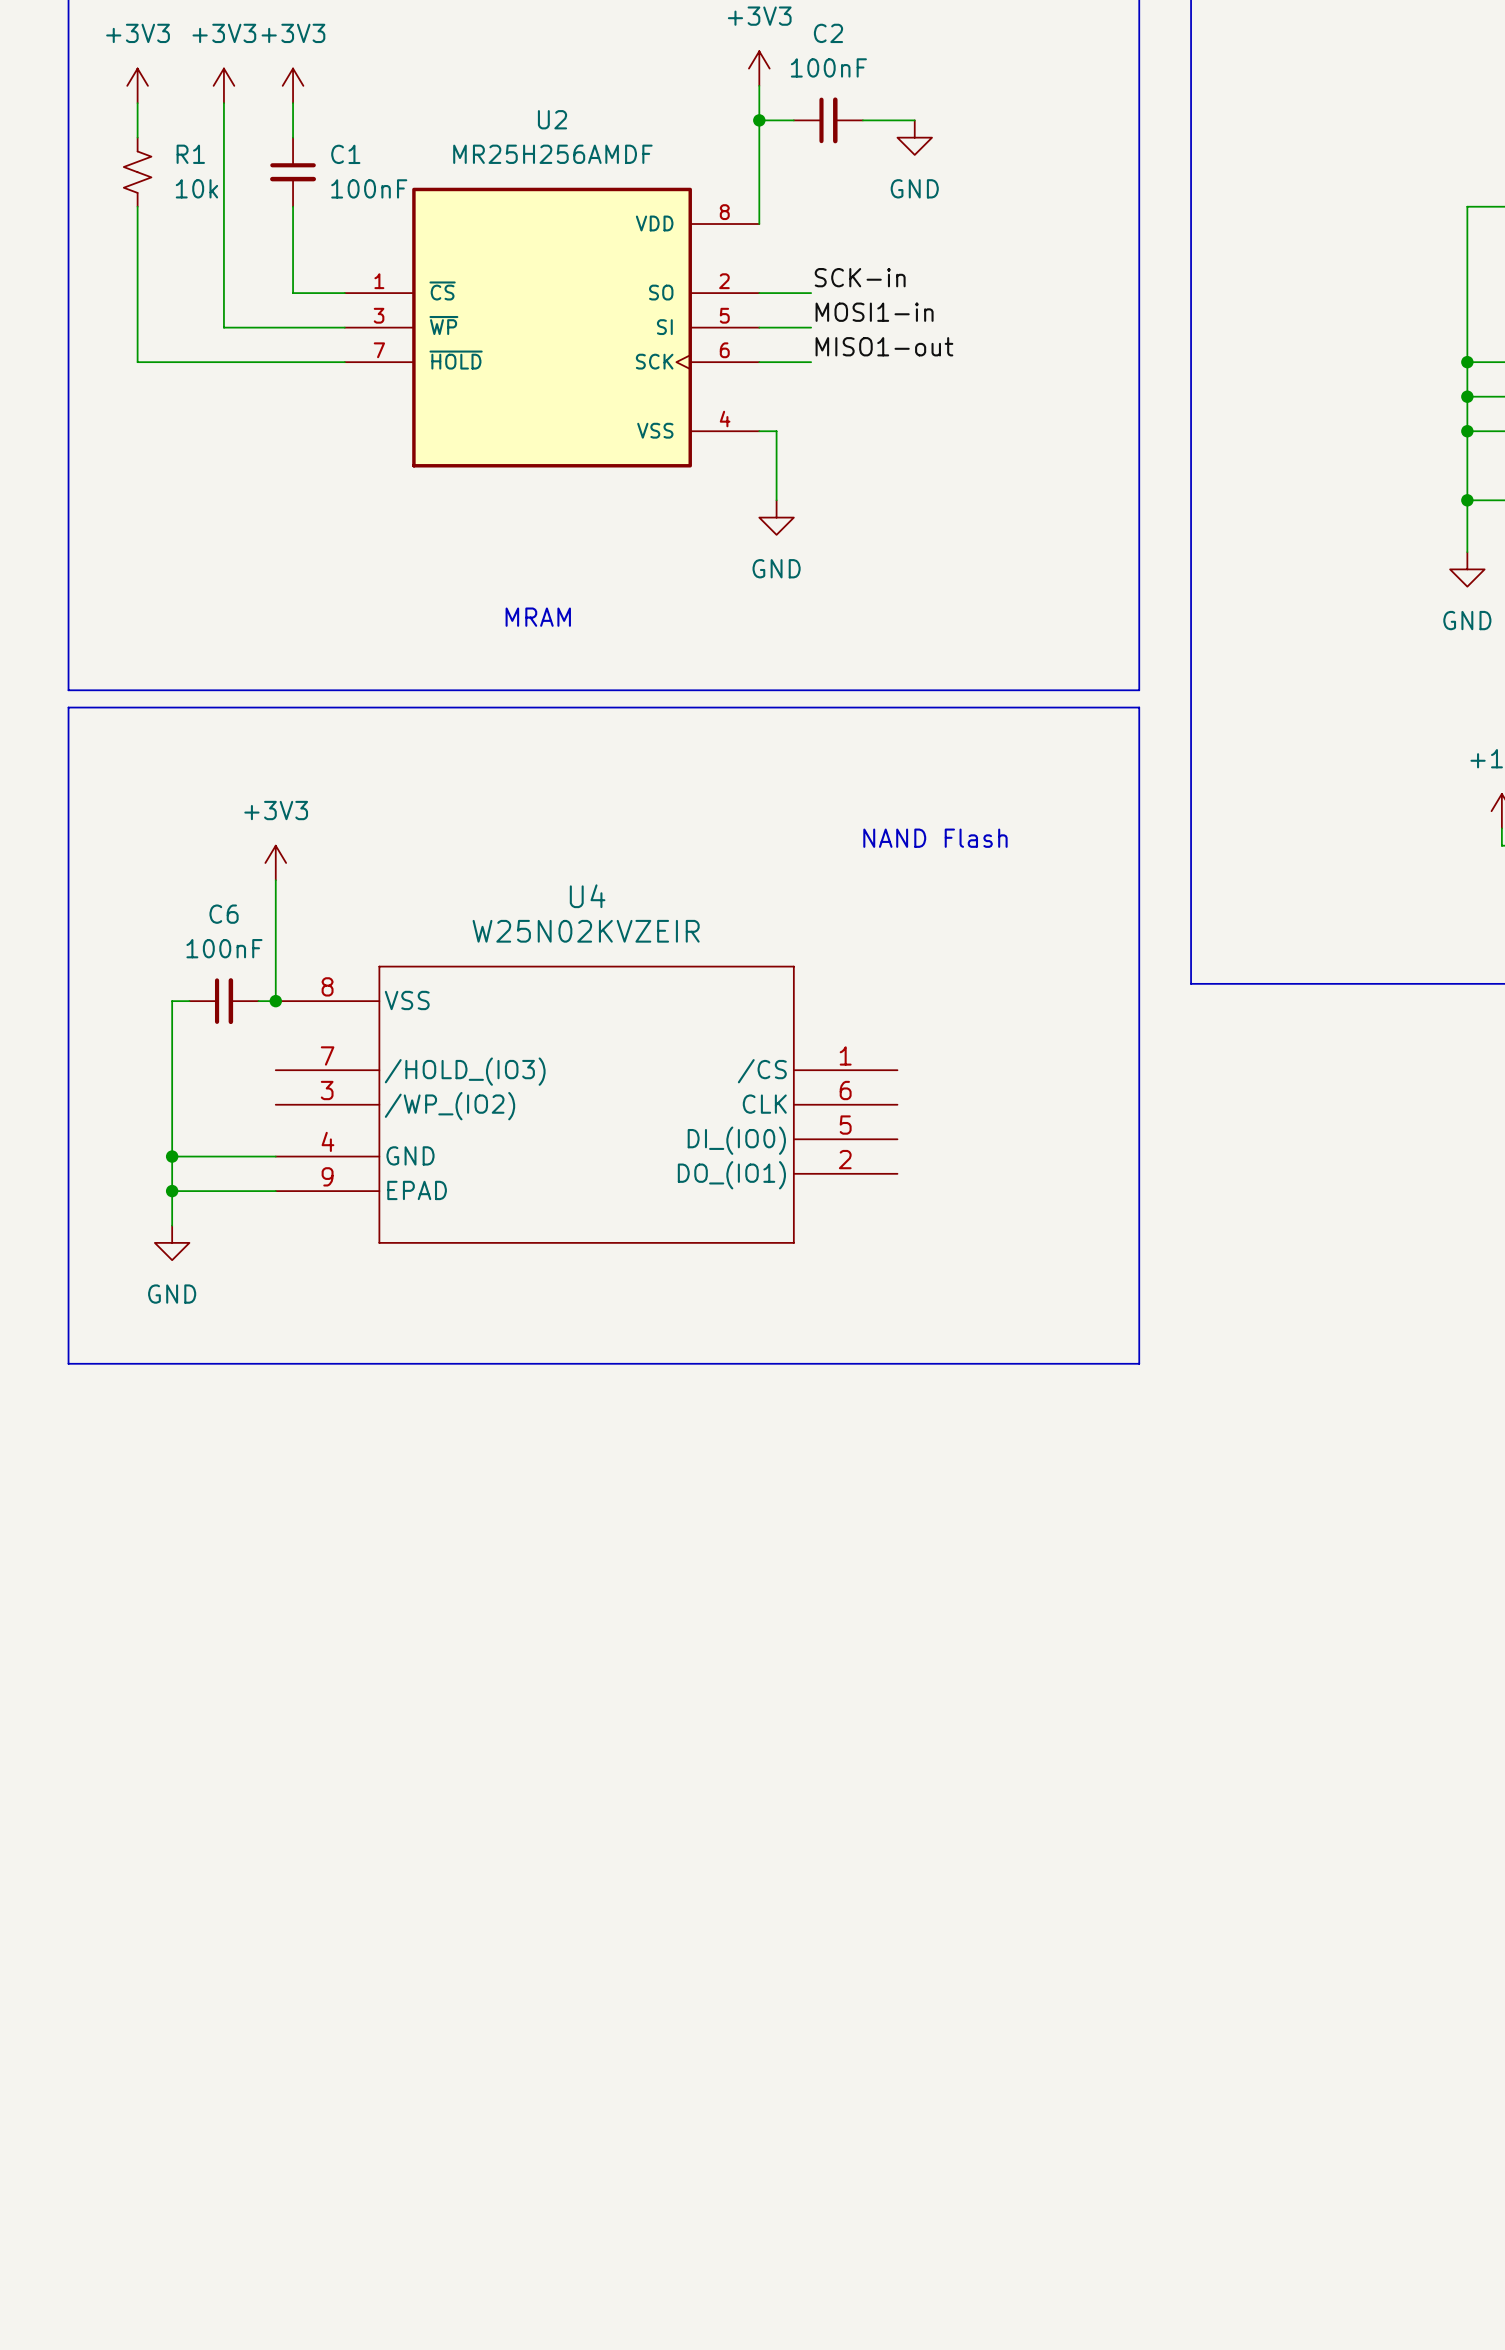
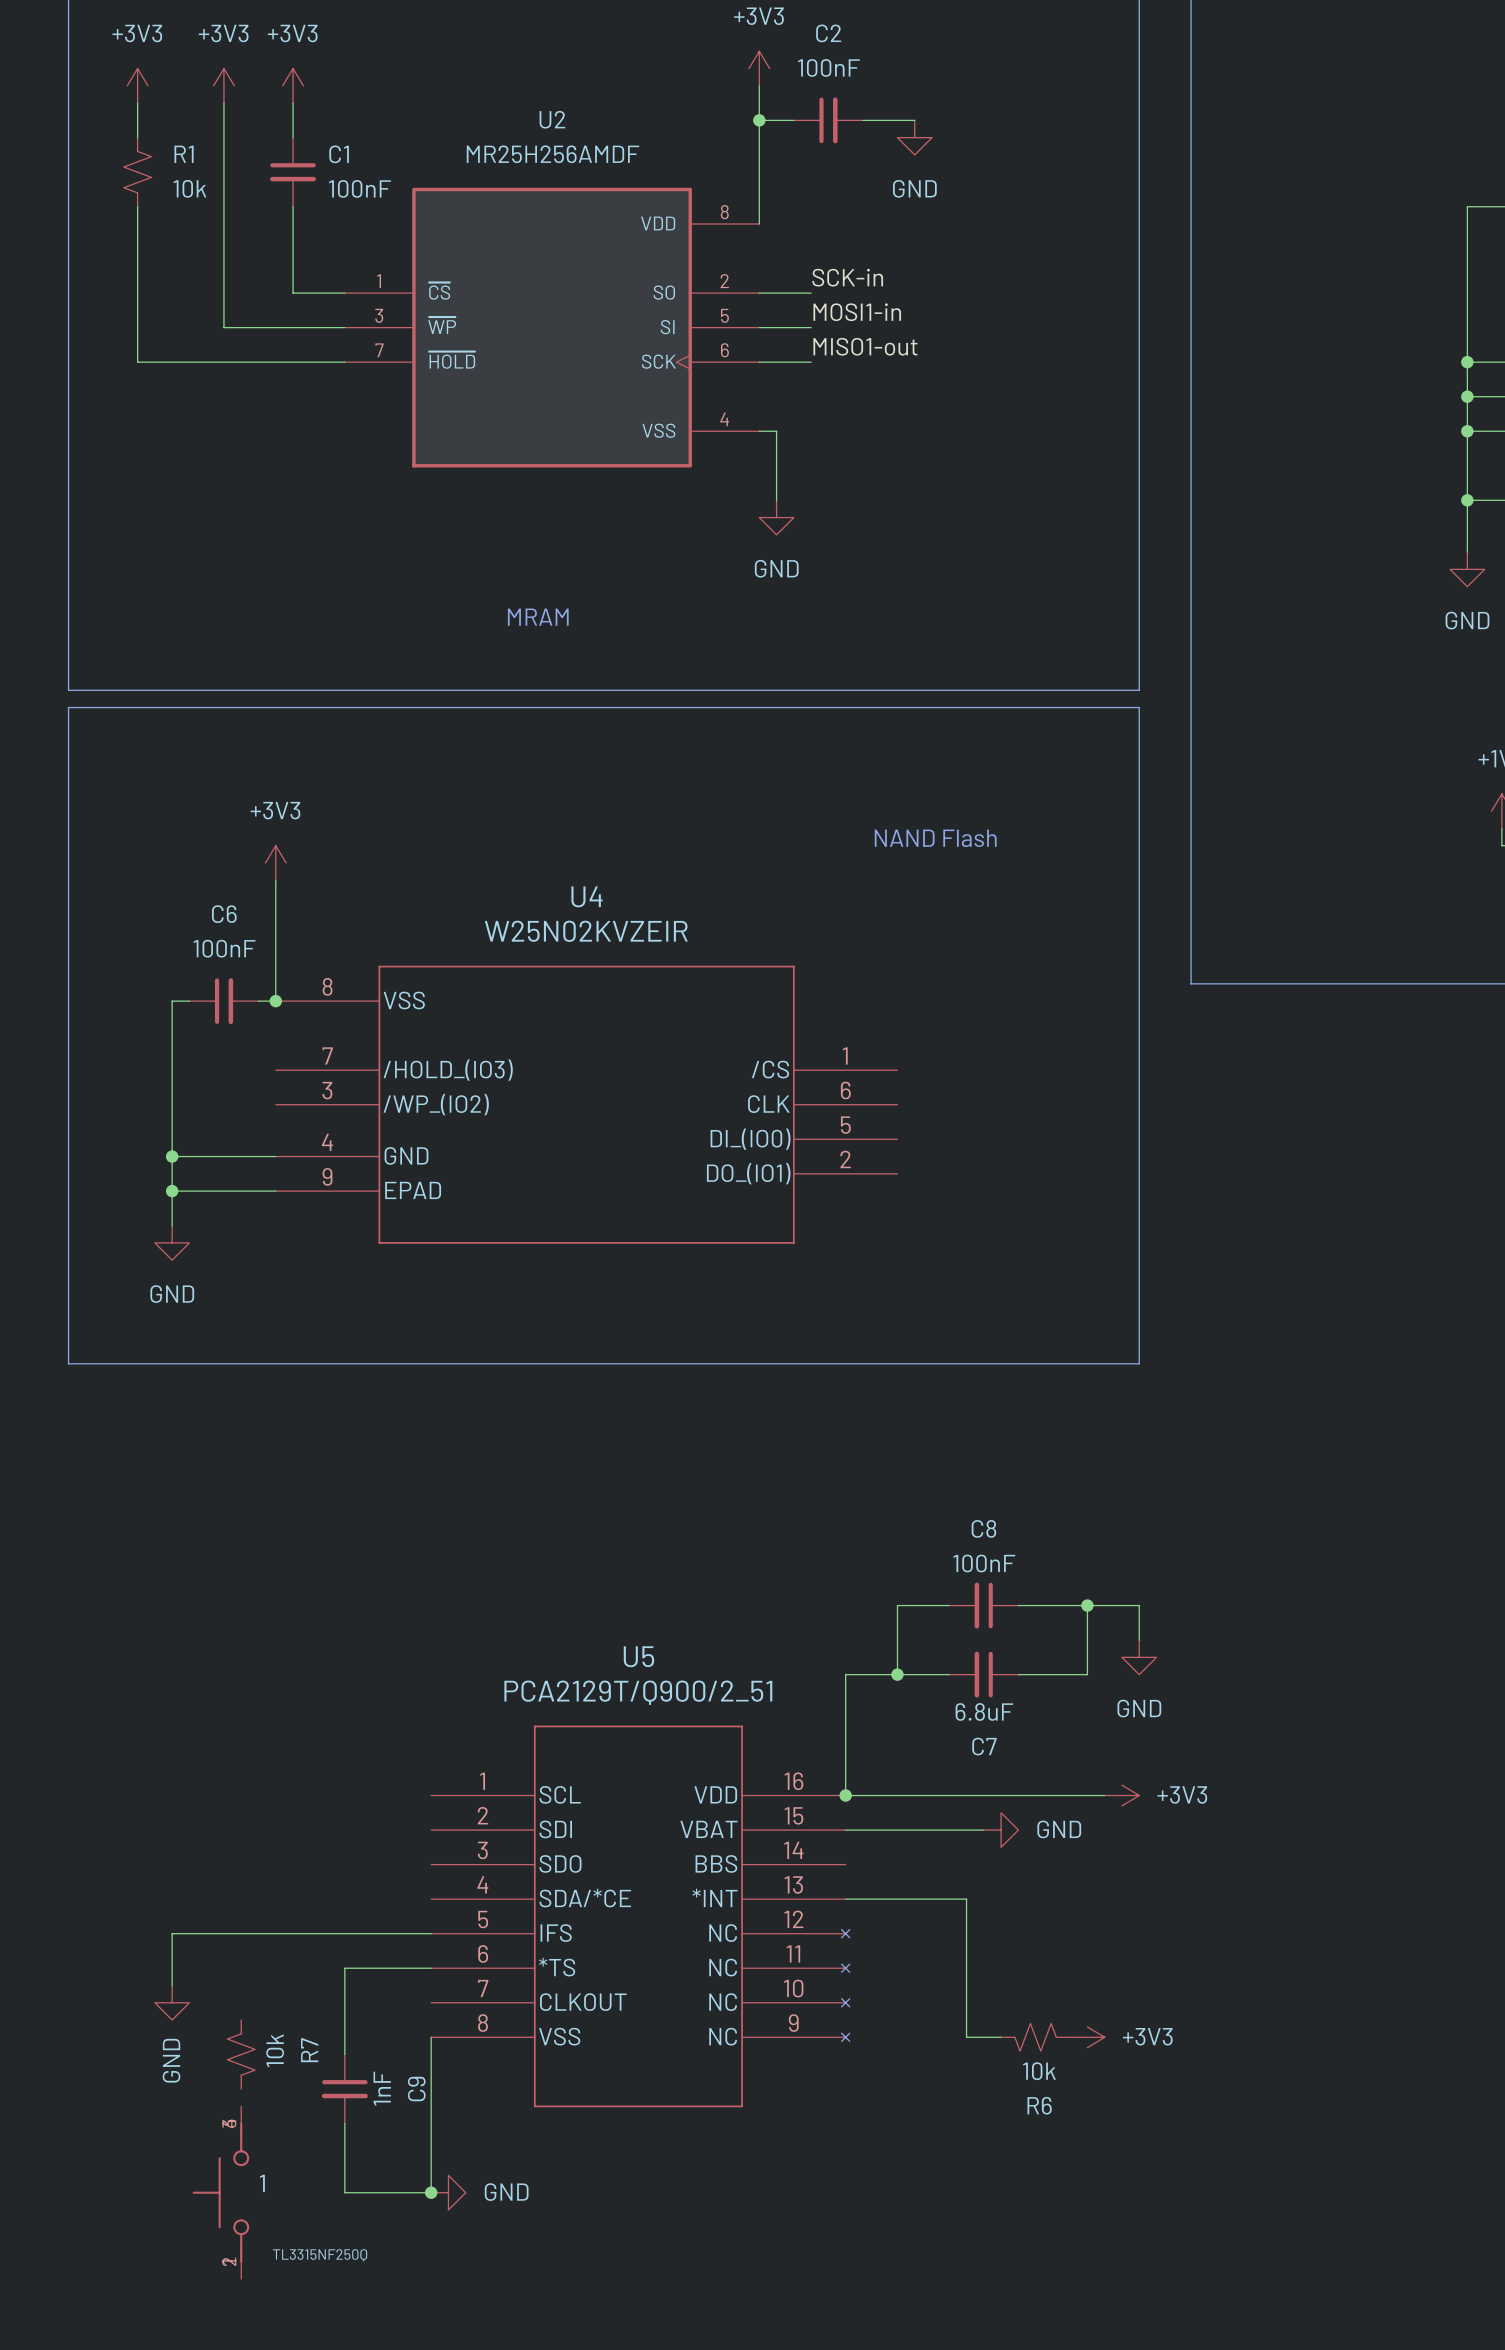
wire: none -> (949, 1605) (897, 1605) (897, 1674)
C8: none -> 100nF (983, 1605)
wire: none -> (1018, 1605) (1139, 1605) (1139, 1640)
wire: none -> (1087, 1605) (1087, 1674) (1018, 1674)
junction: none -> (1087, 1605)
power symbol: none -> GND (1139, 1657)
junction: none -> (897, 1674)
wire: none -> (949, 1674) (845, 1674) (845, 1795) (1104, 1795)
C7: none -> 6.8uF (983, 1674)
junction: none -> (845, 1795)
power symbol: none -> +3V3 (1121, 1795)
wire: none -> (845, 1830) (983, 1830)
power symbol: none -> GND (1001, 1830)
wire: none -> (845, 1899) (966, 1899) (966, 2037) (1001, 2037)
U5: none -> PCA2129T/Q900/2_51 (640, 1916)
wire: none -> (431, 1933) (172, 1933) (172, 1985)
wire: none -> (431, 1968) (344, 1968) (344, 2054)
power symbol: none -> GND (172, 2002)
wire: none -> (431, 2037) (431, 2192) (344, 2192) (344, 2123)
R6: none -> 10k (1035, 2037)
power symbol: none -> +3V3 (1087, 2037)
R7: none -> 10k (241, 2054)
C9: none -> 1nF (344, 2089)
1: none -> TL3315NF250Q (220, 2192)
junction: none -> (431, 2192)
power symbol: none -> GND (448, 2192)

